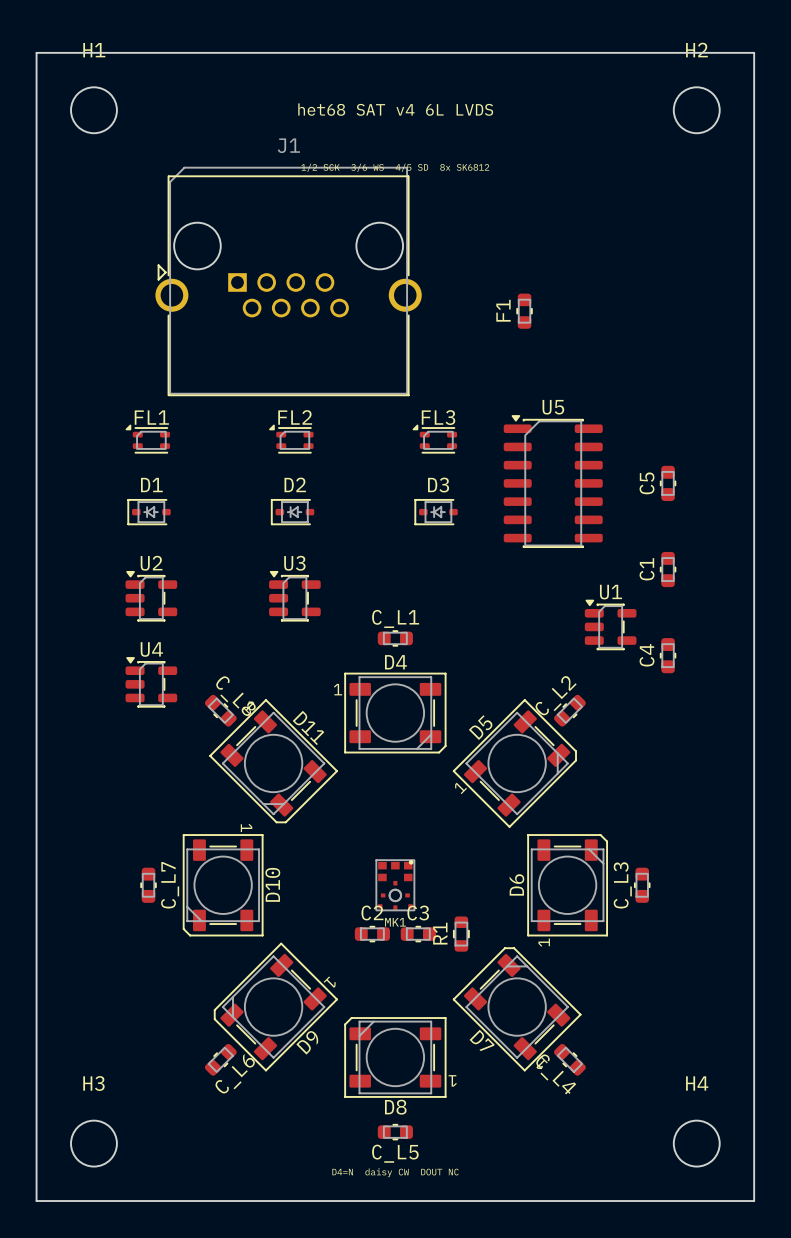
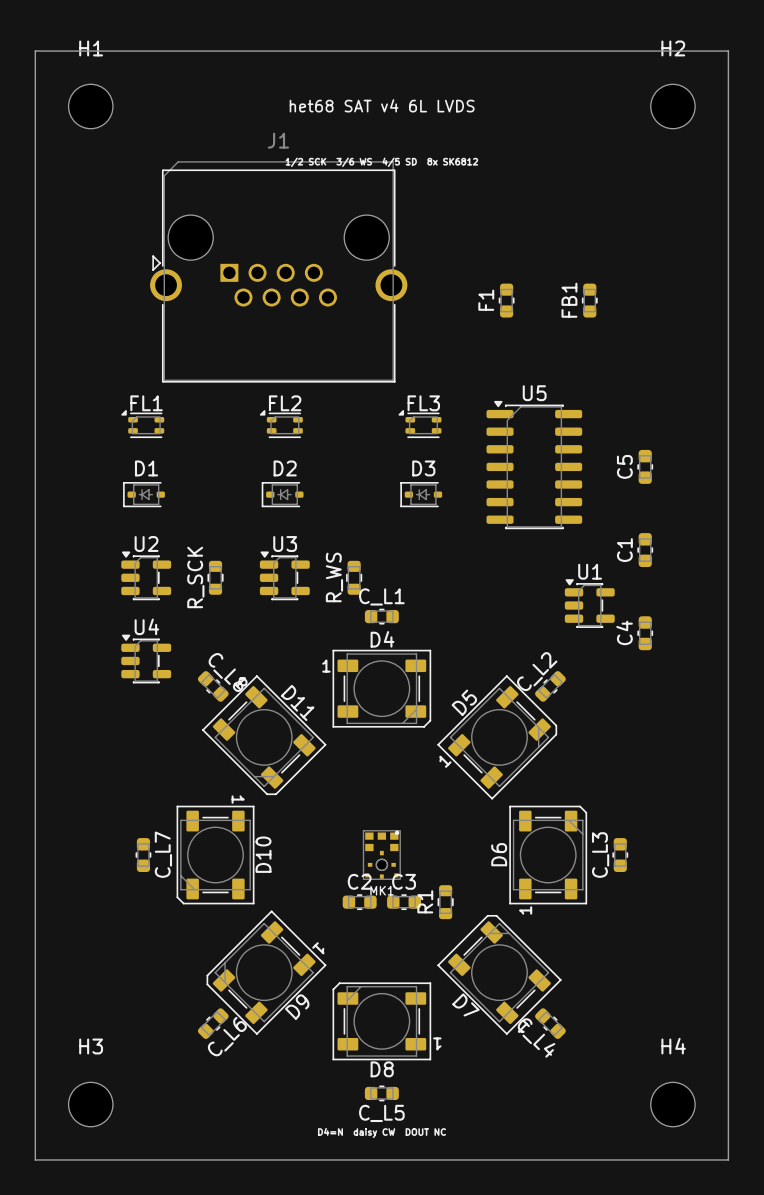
FB1: none -> (589, 300)
R_SCK: none -> (215, 577)
R_WS: none -> (354, 577)

